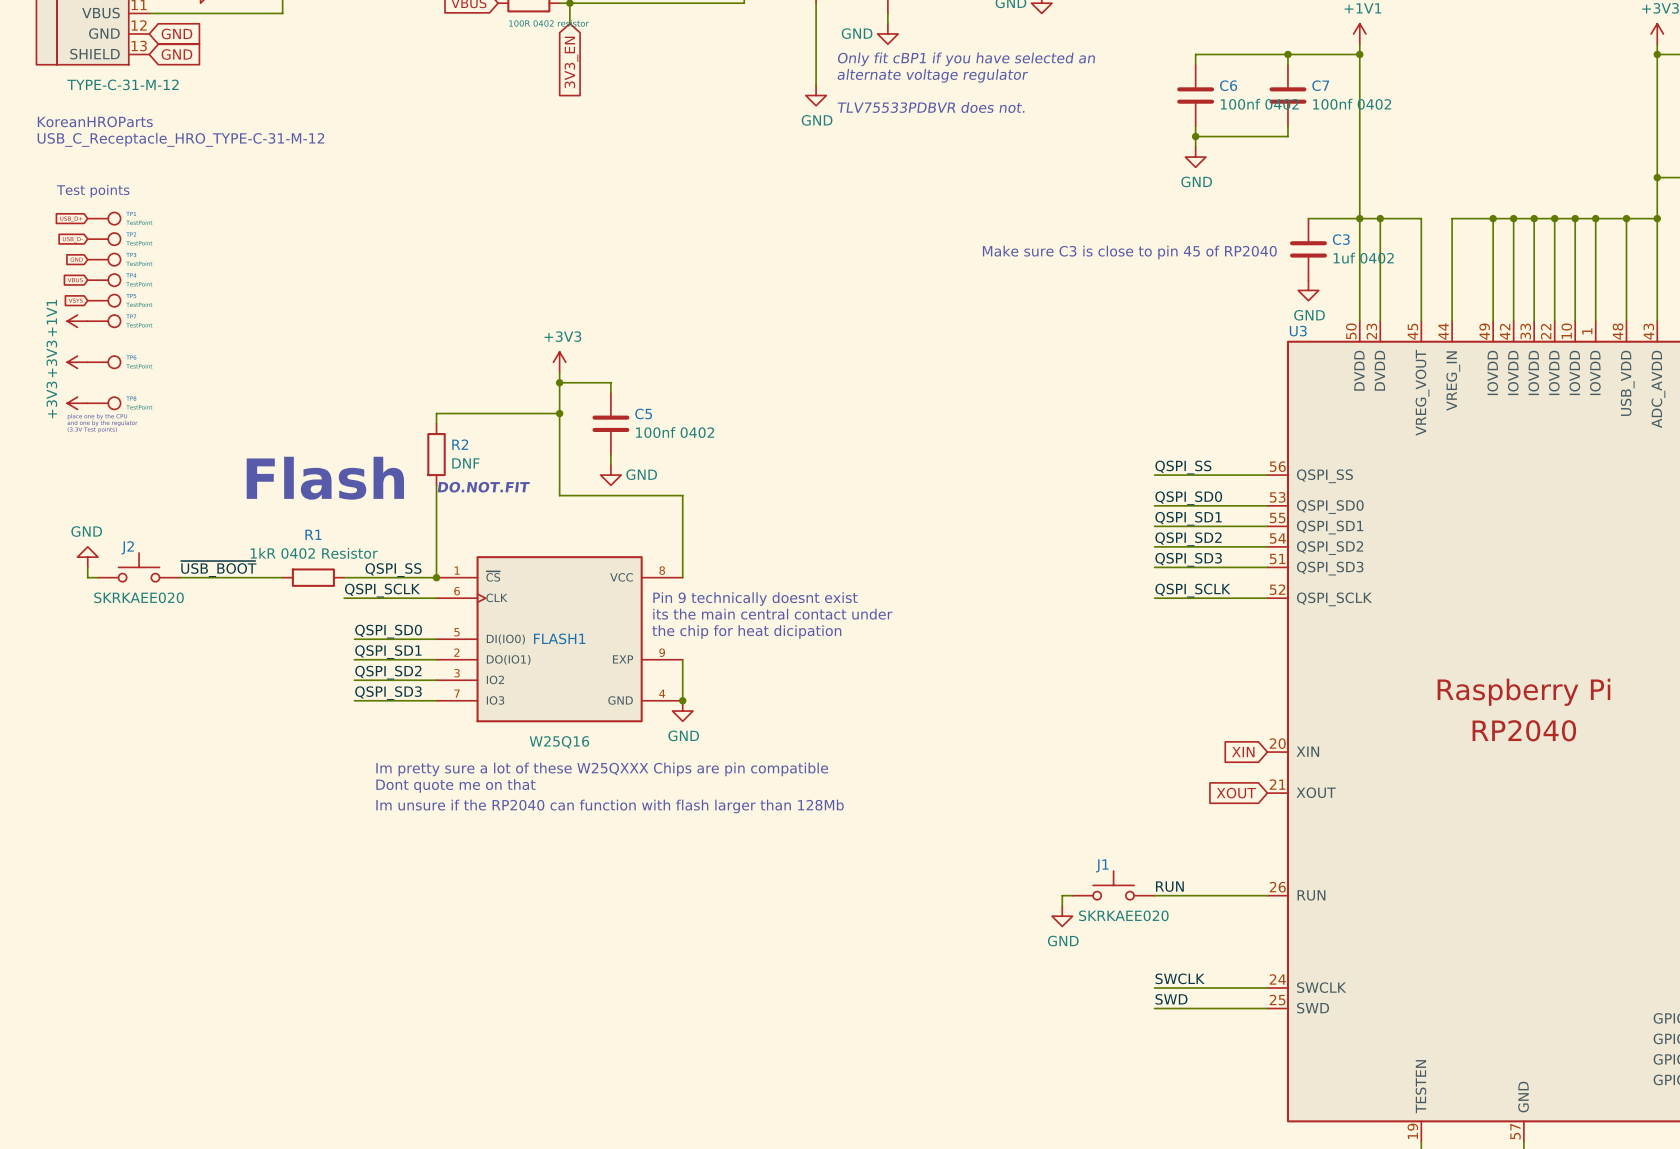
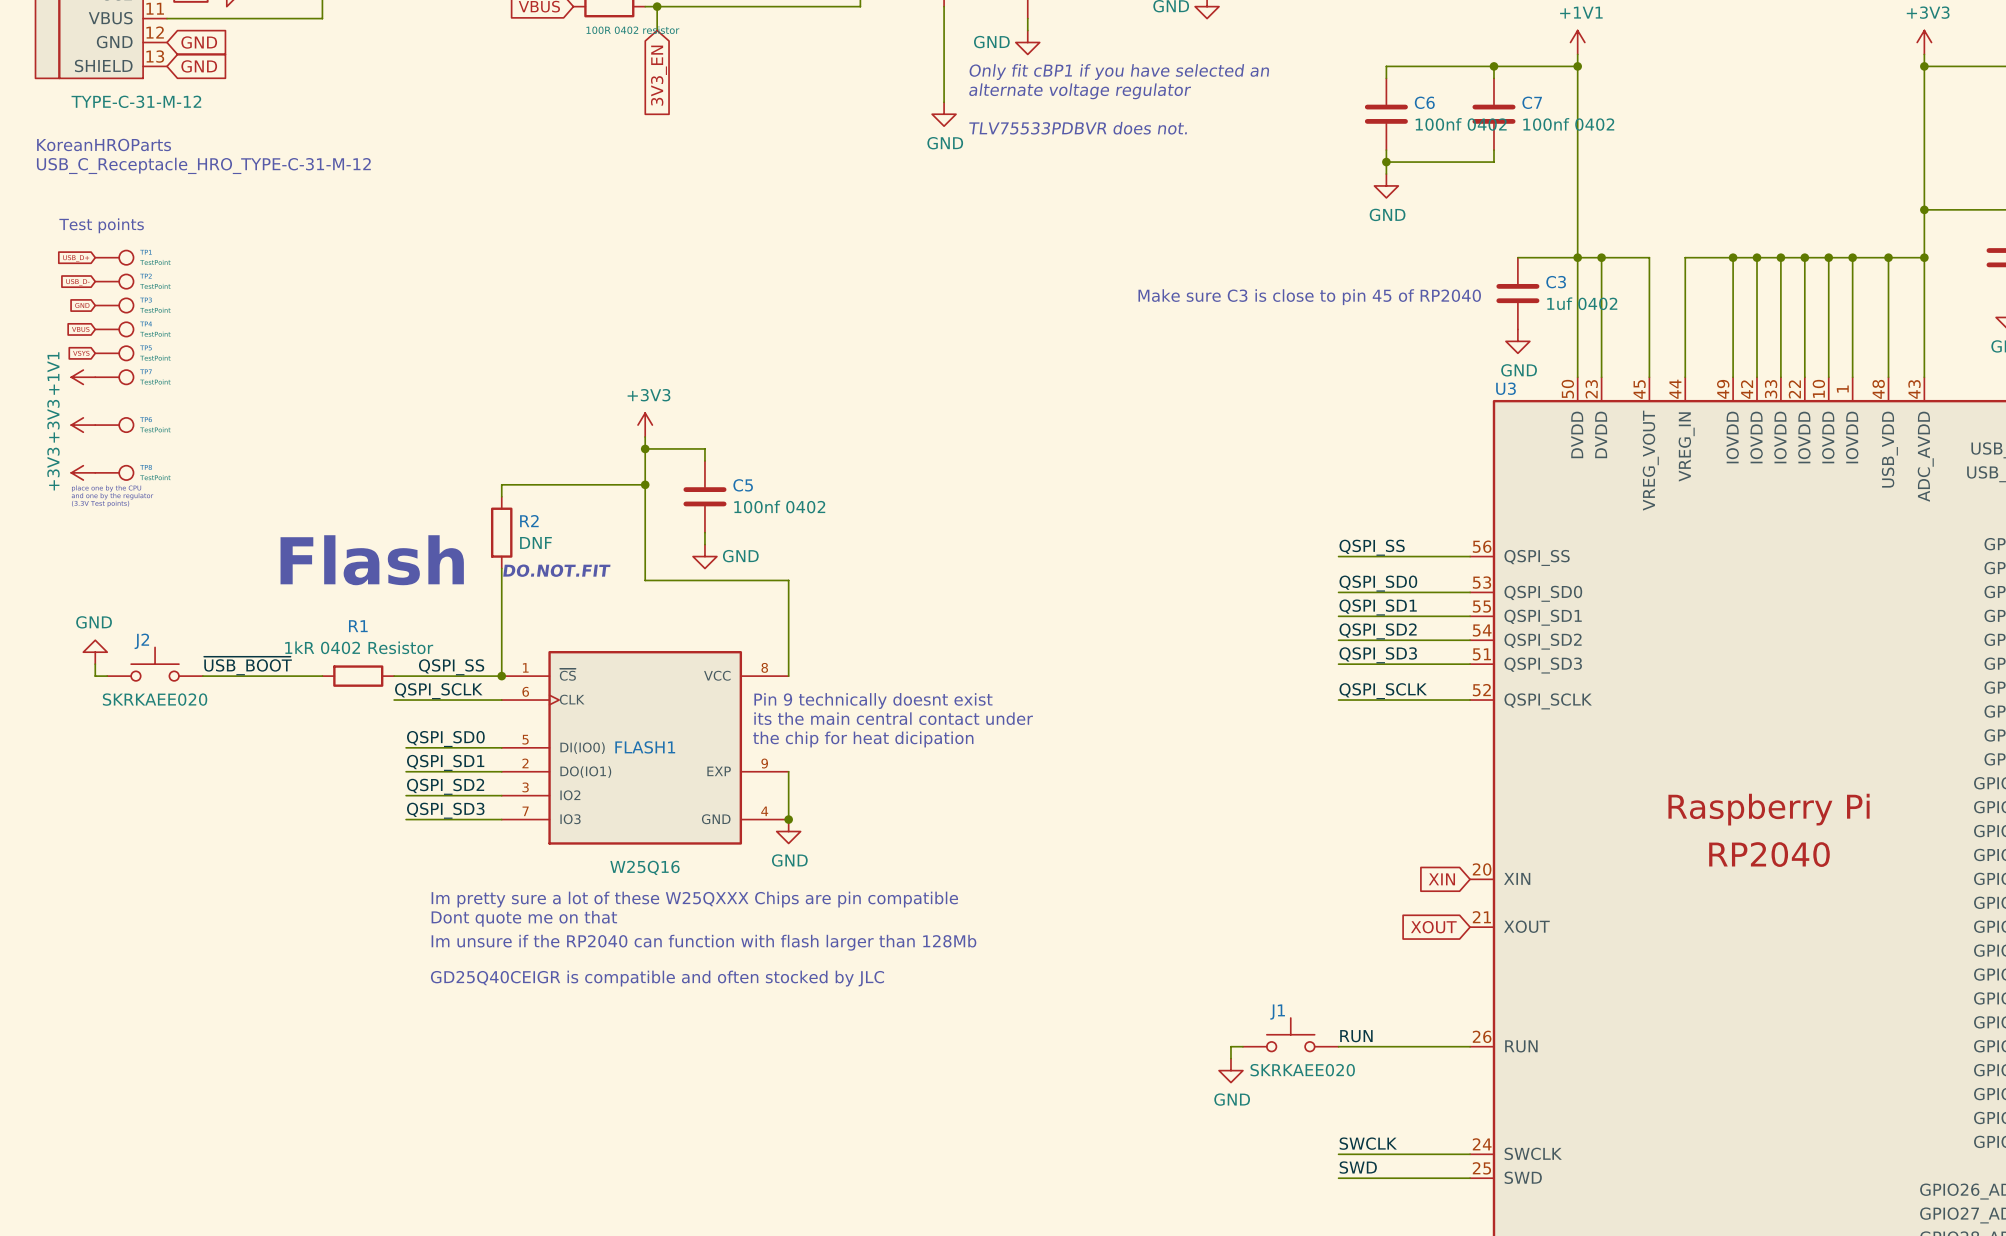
text: none -> GD25Q40CEIGR is compatible and often stocked by JLC (657, 978)

